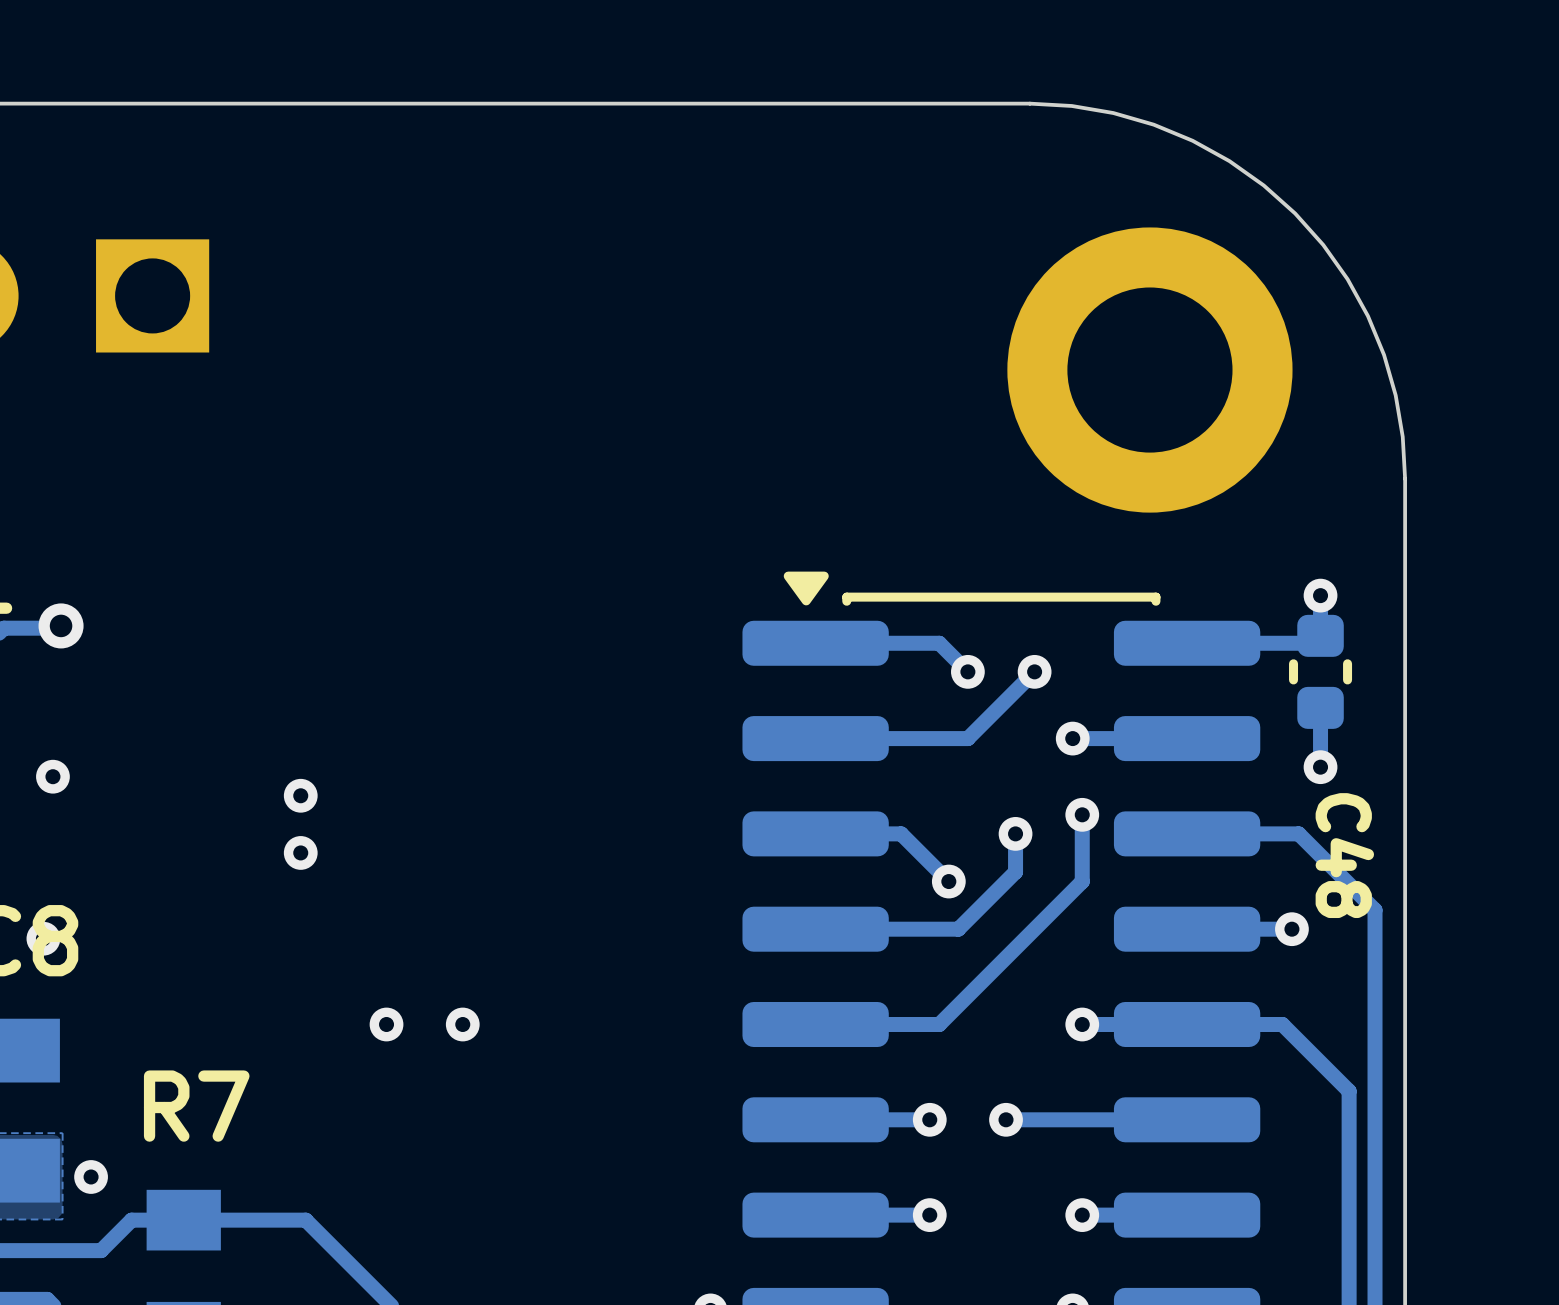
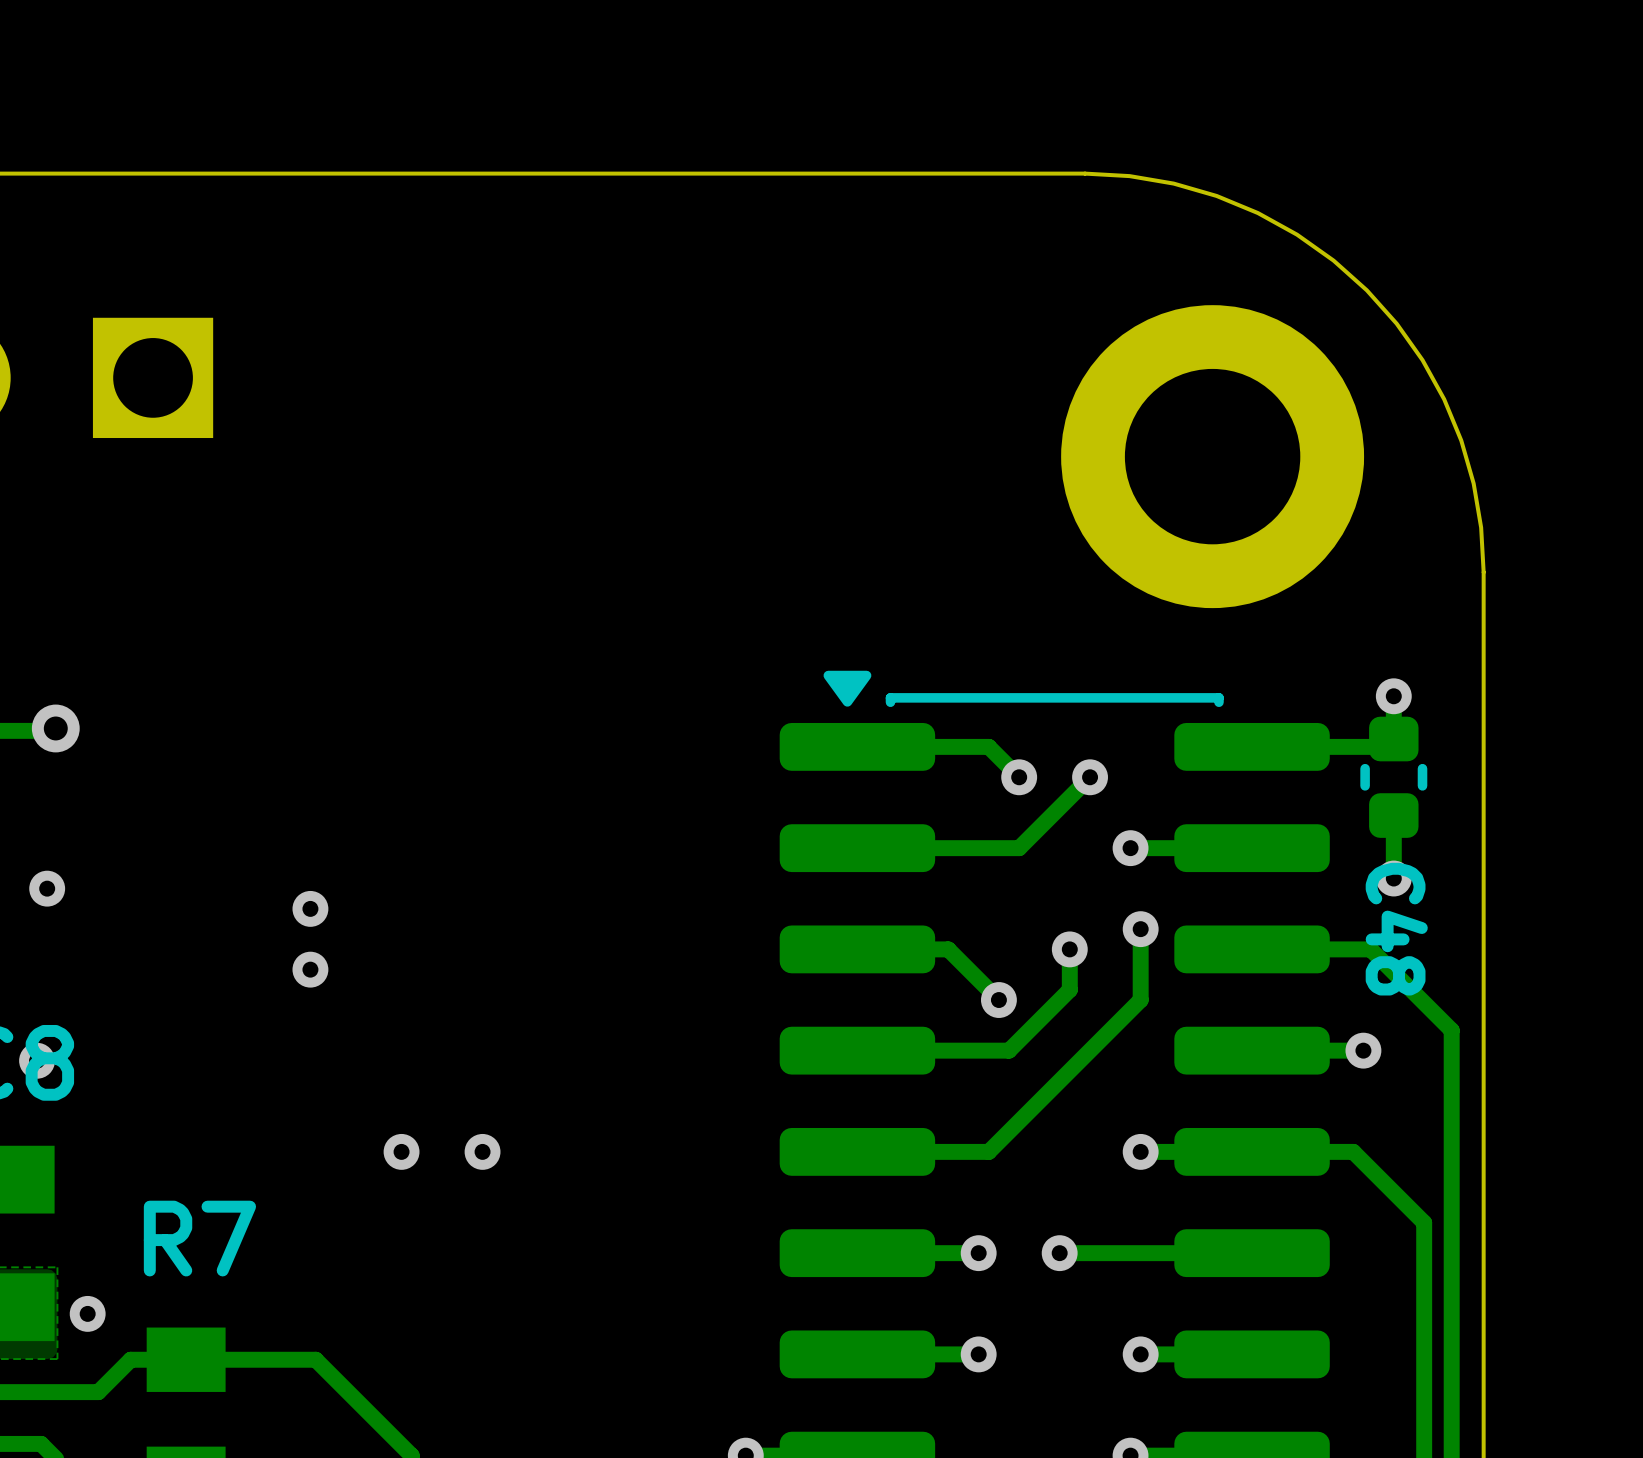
C48 name position: C48 (1344, 855) -> C48 (1396, 929)

